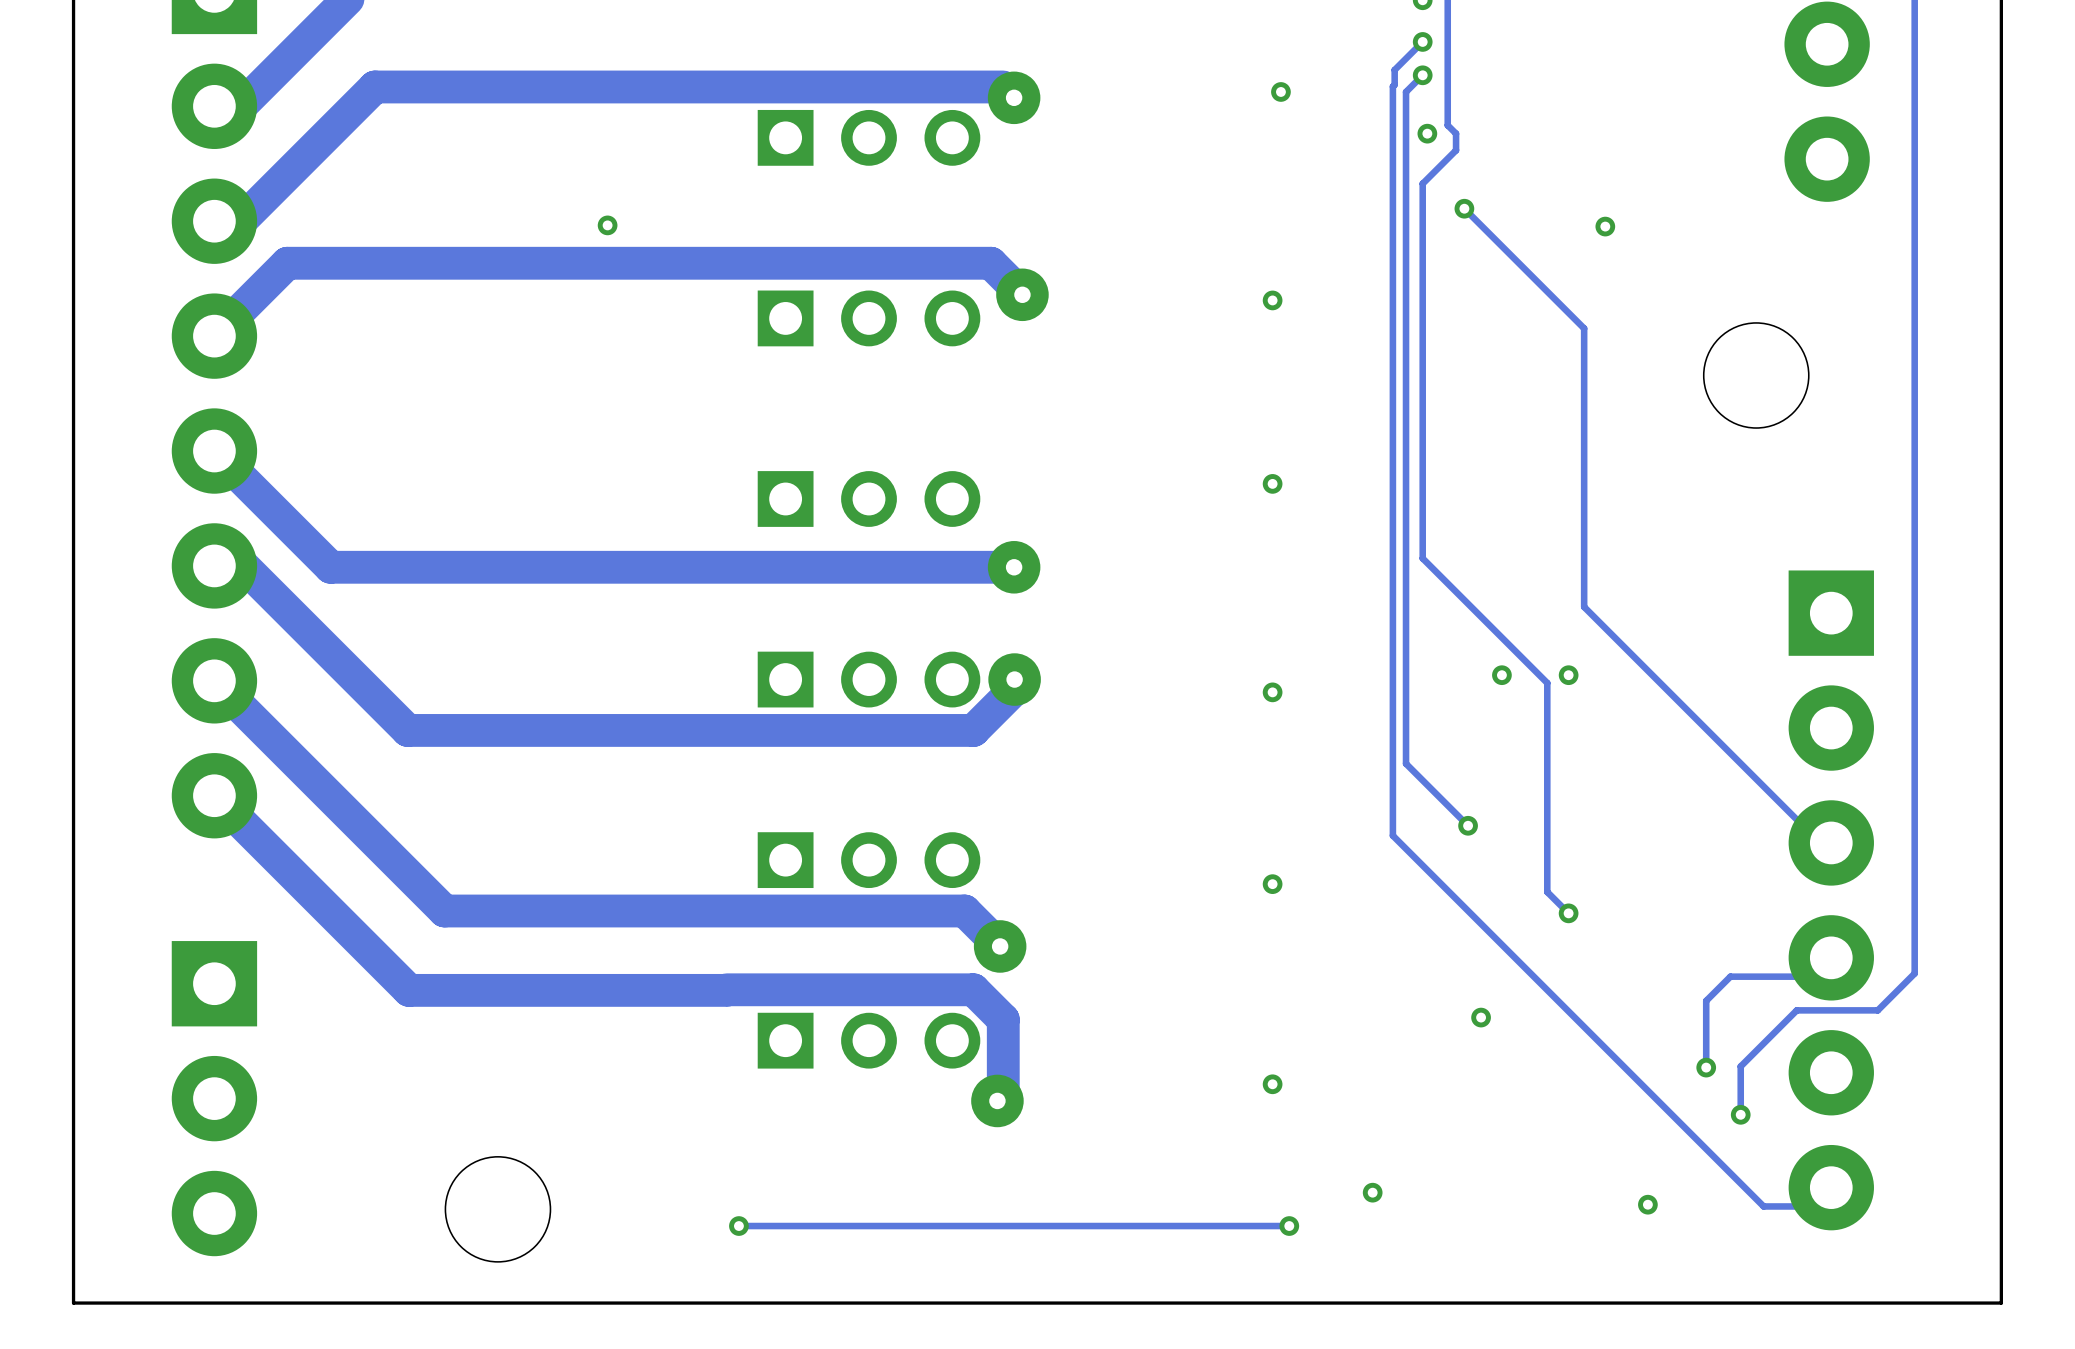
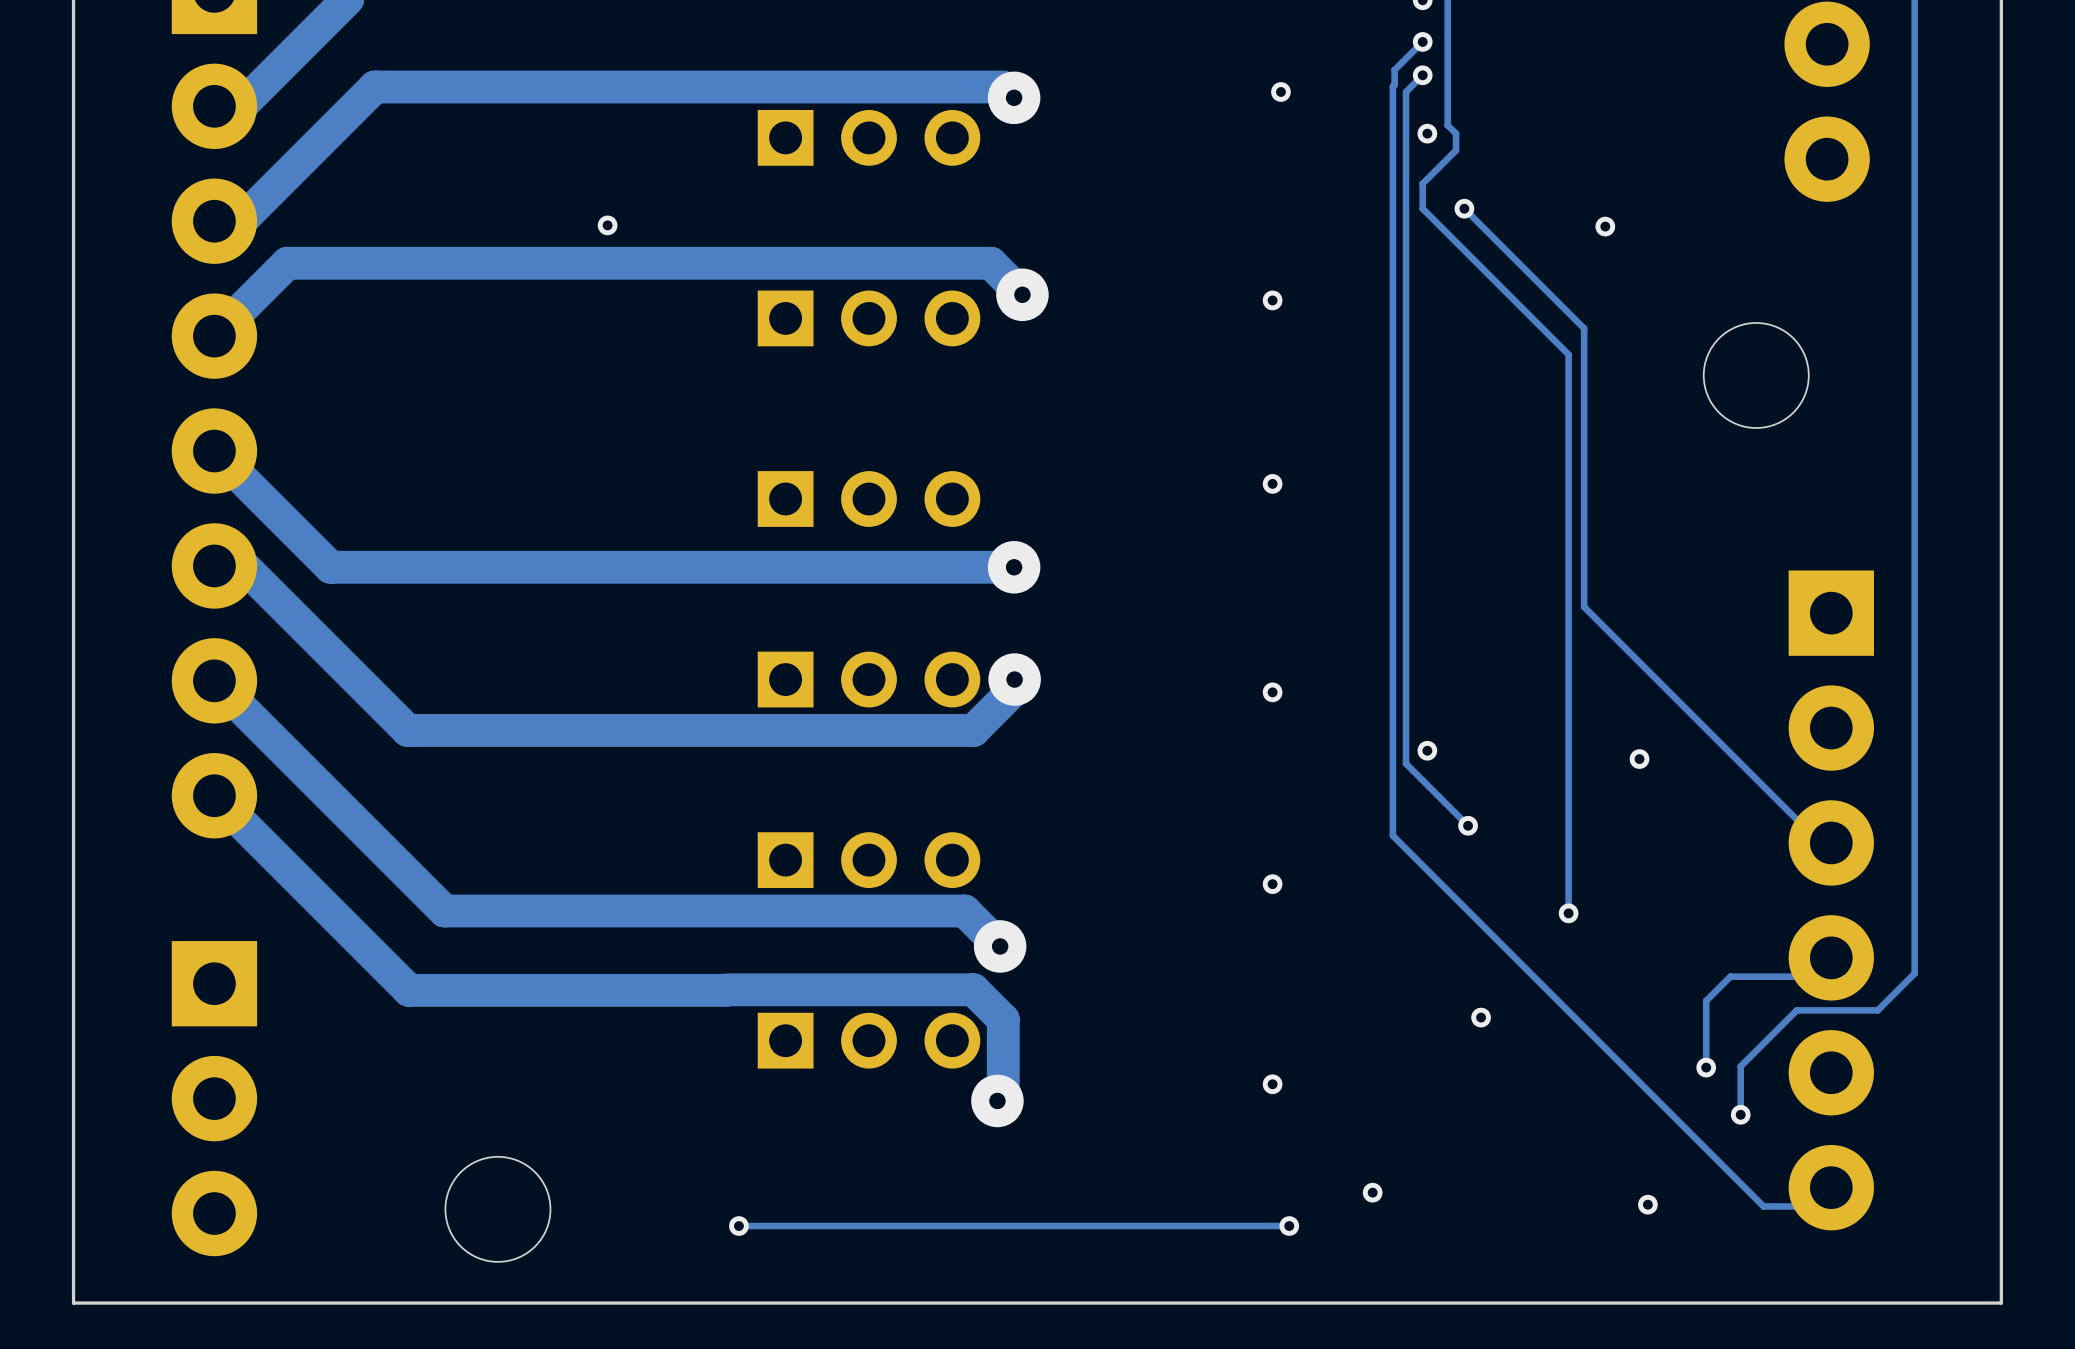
track: (1422, 208) (1422, 558) (1547, 683) (1547, 892) (1568, 913) -> (1422, 208) (1568, 354) (1568, 913)
via: (1501, 675) -> none
via: (1568, 675) -> none
via: none -> (1427, 750)
via: none -> (1639, 759)

